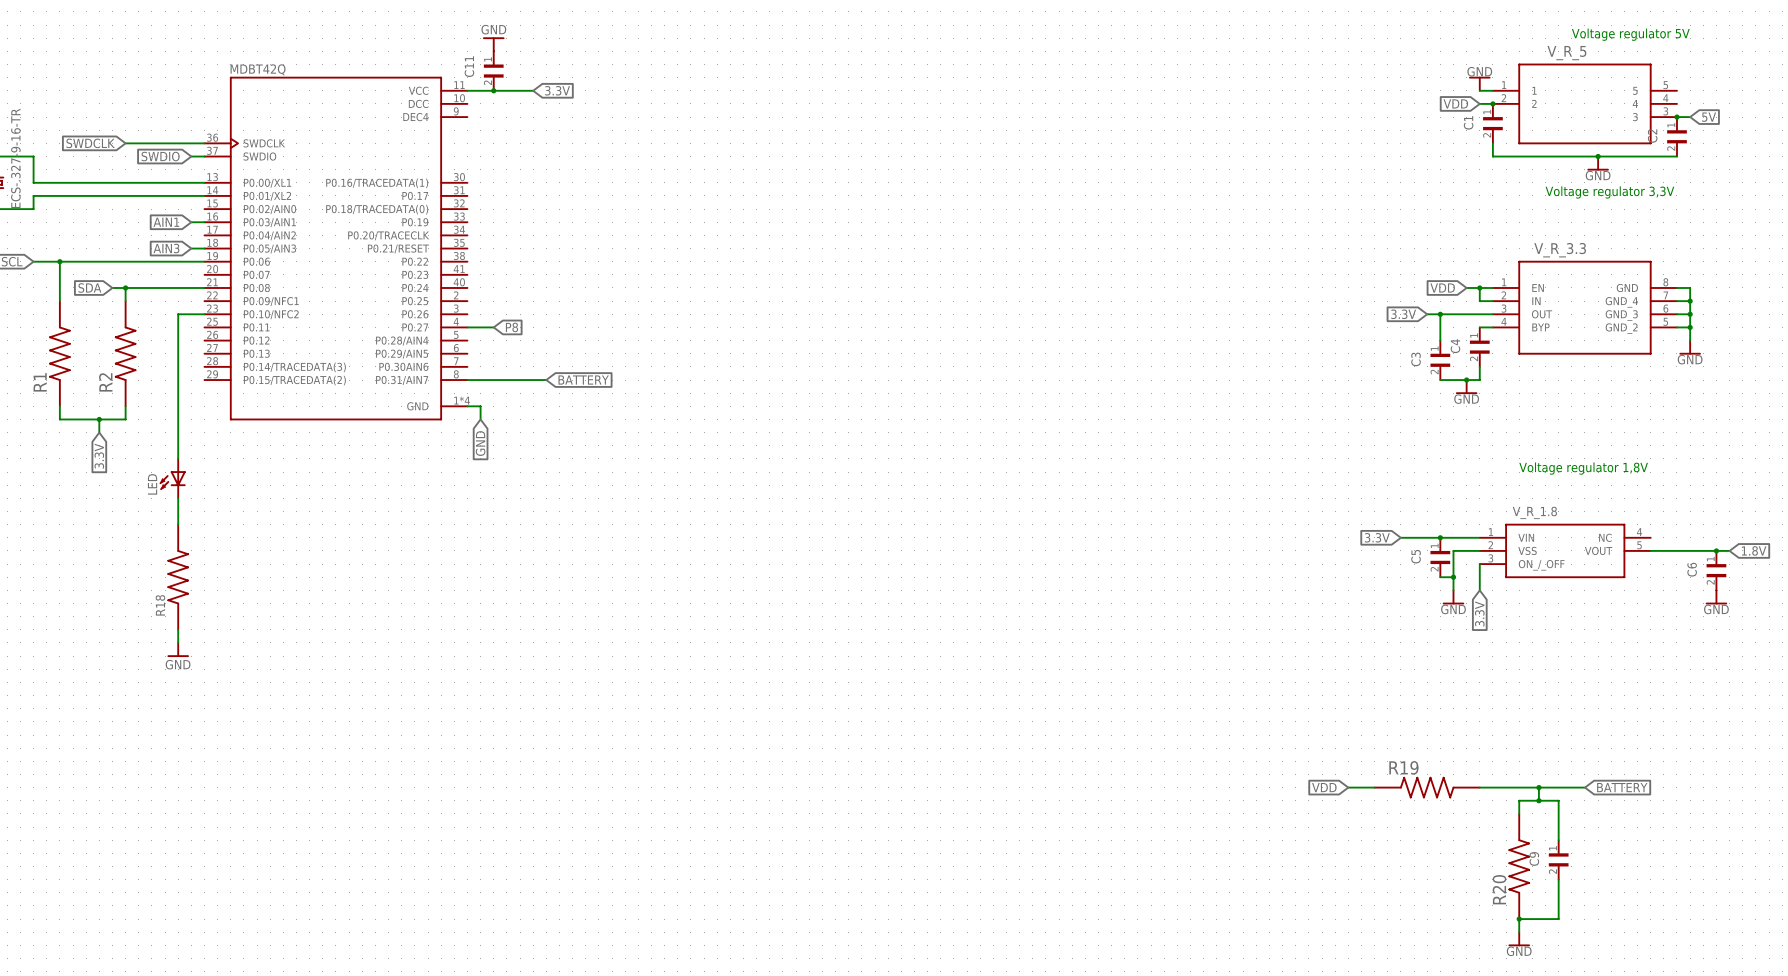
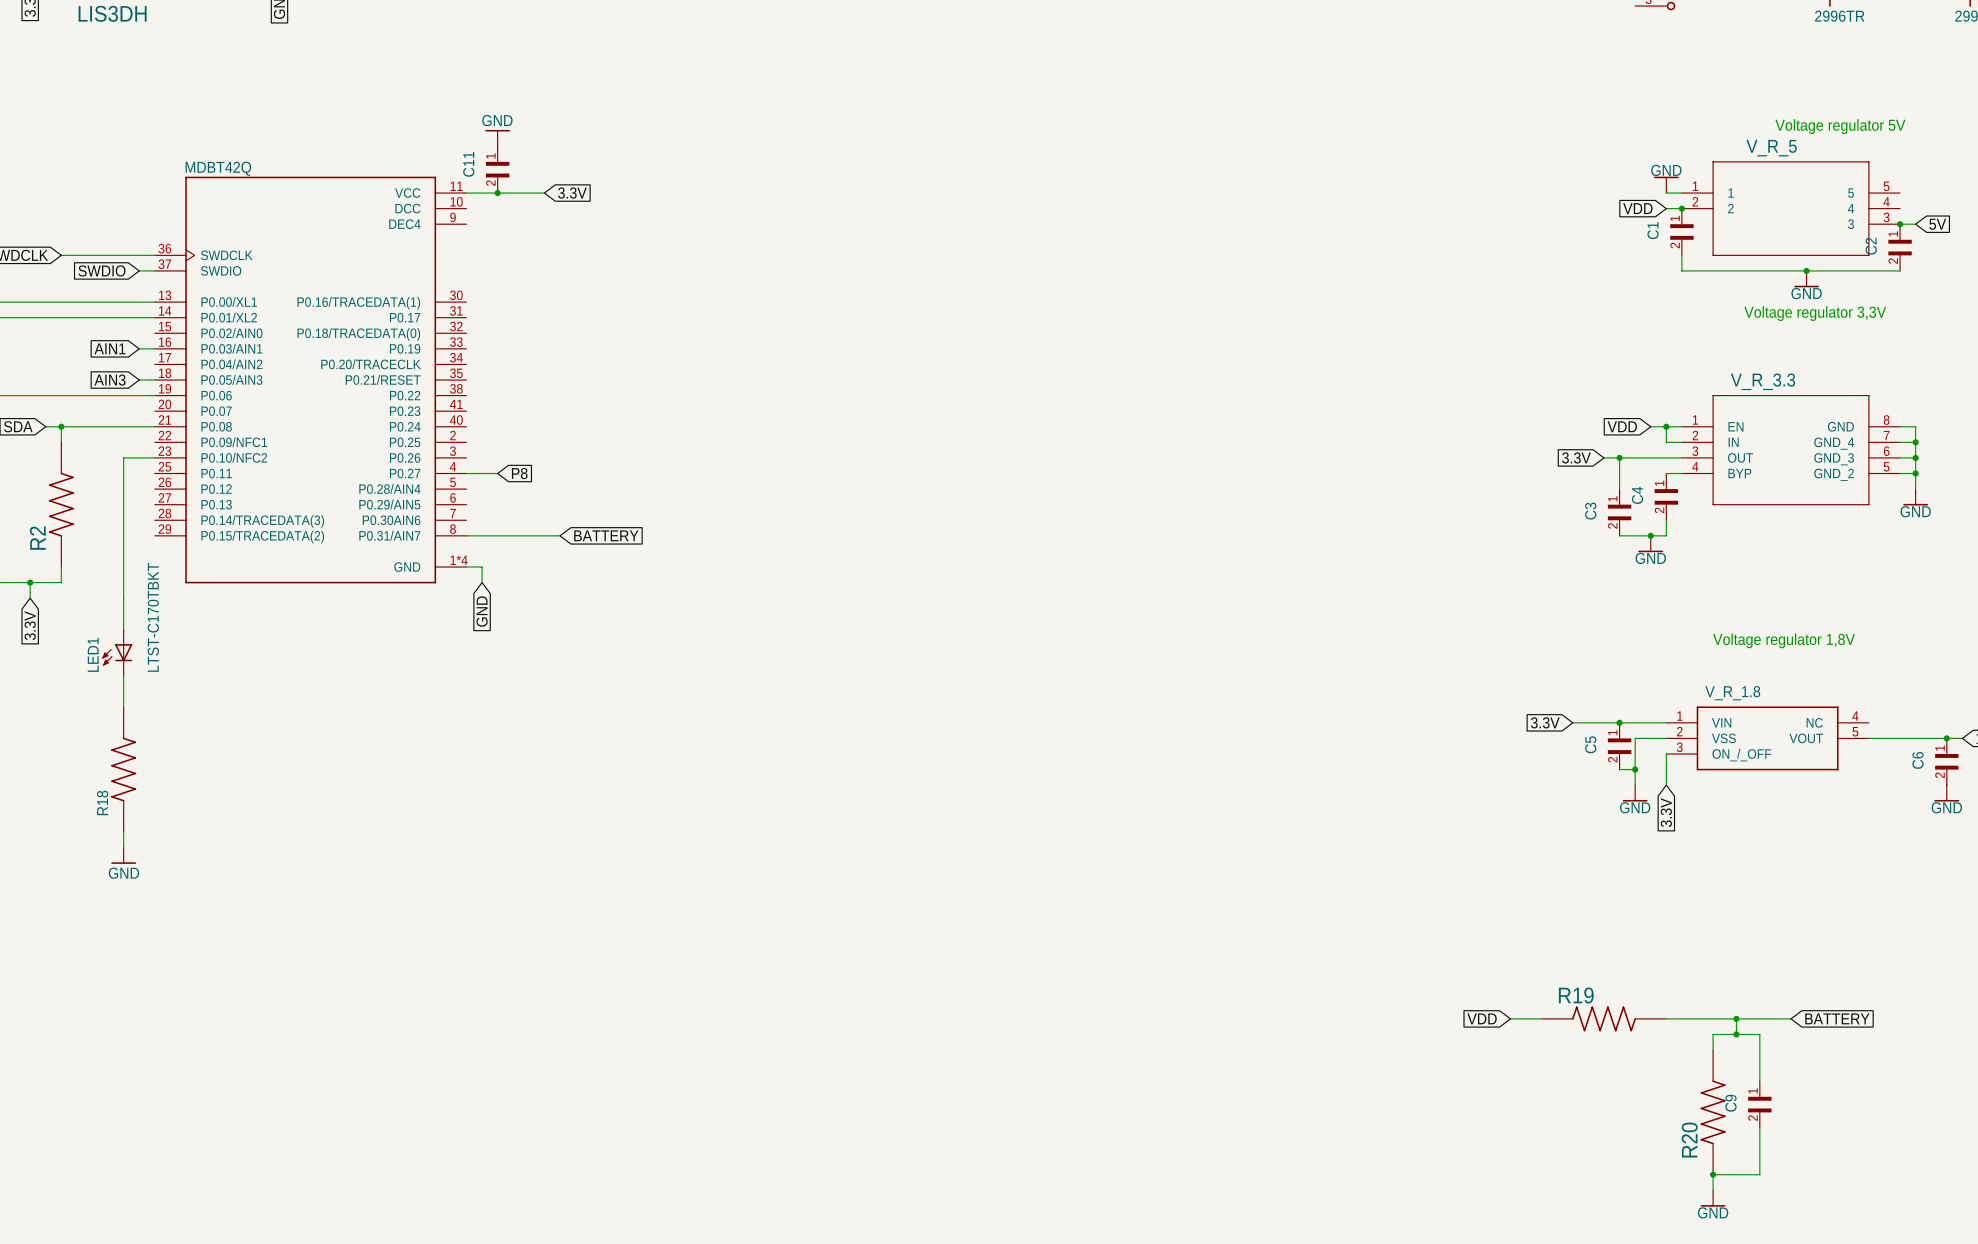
LED value: none -> LTST-C170TBKT (153, 617)
LED name: LED (152, 484) -> LED1 (93, 654)

